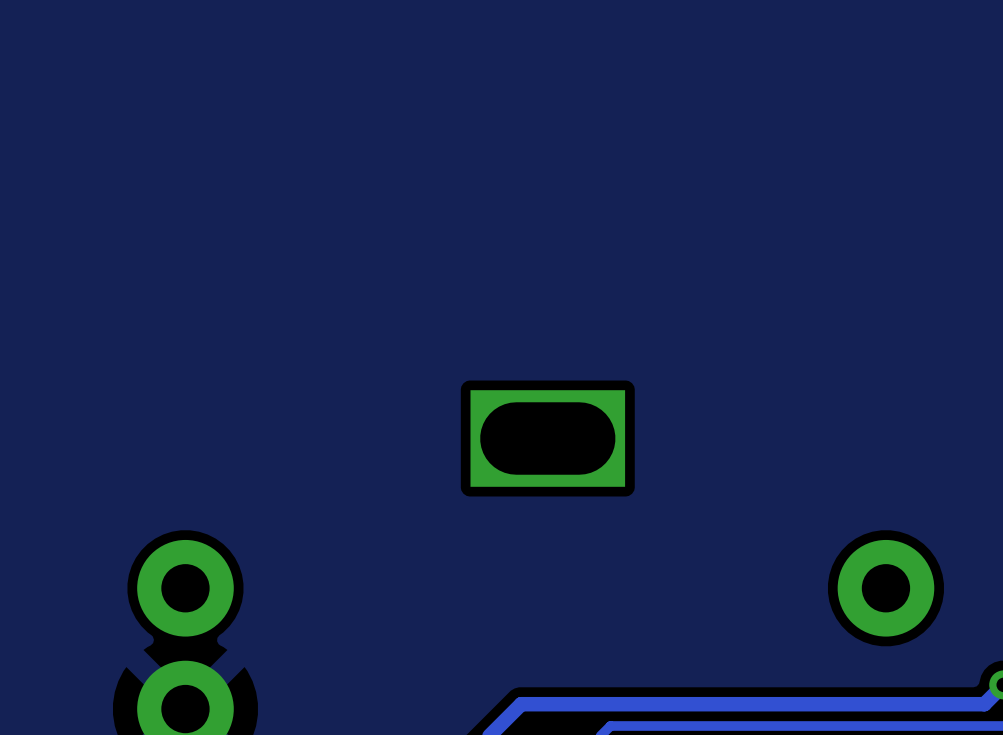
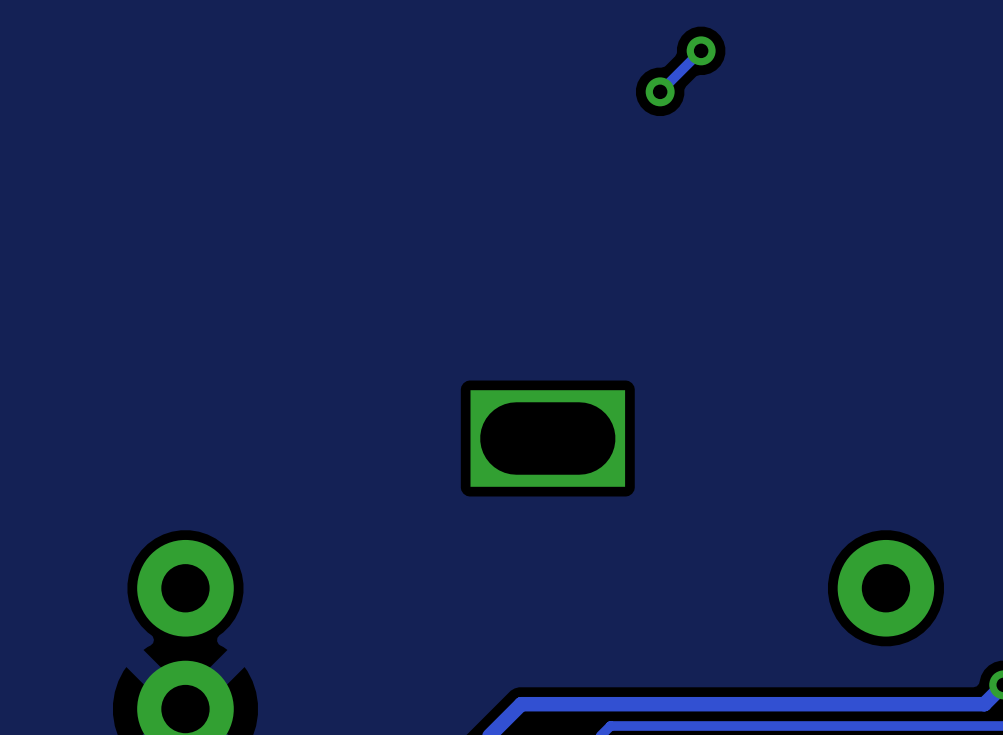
track: none -> (701, 50) (660, 91)
via: none -> (701, 50)
via: none -> (660, 91)

